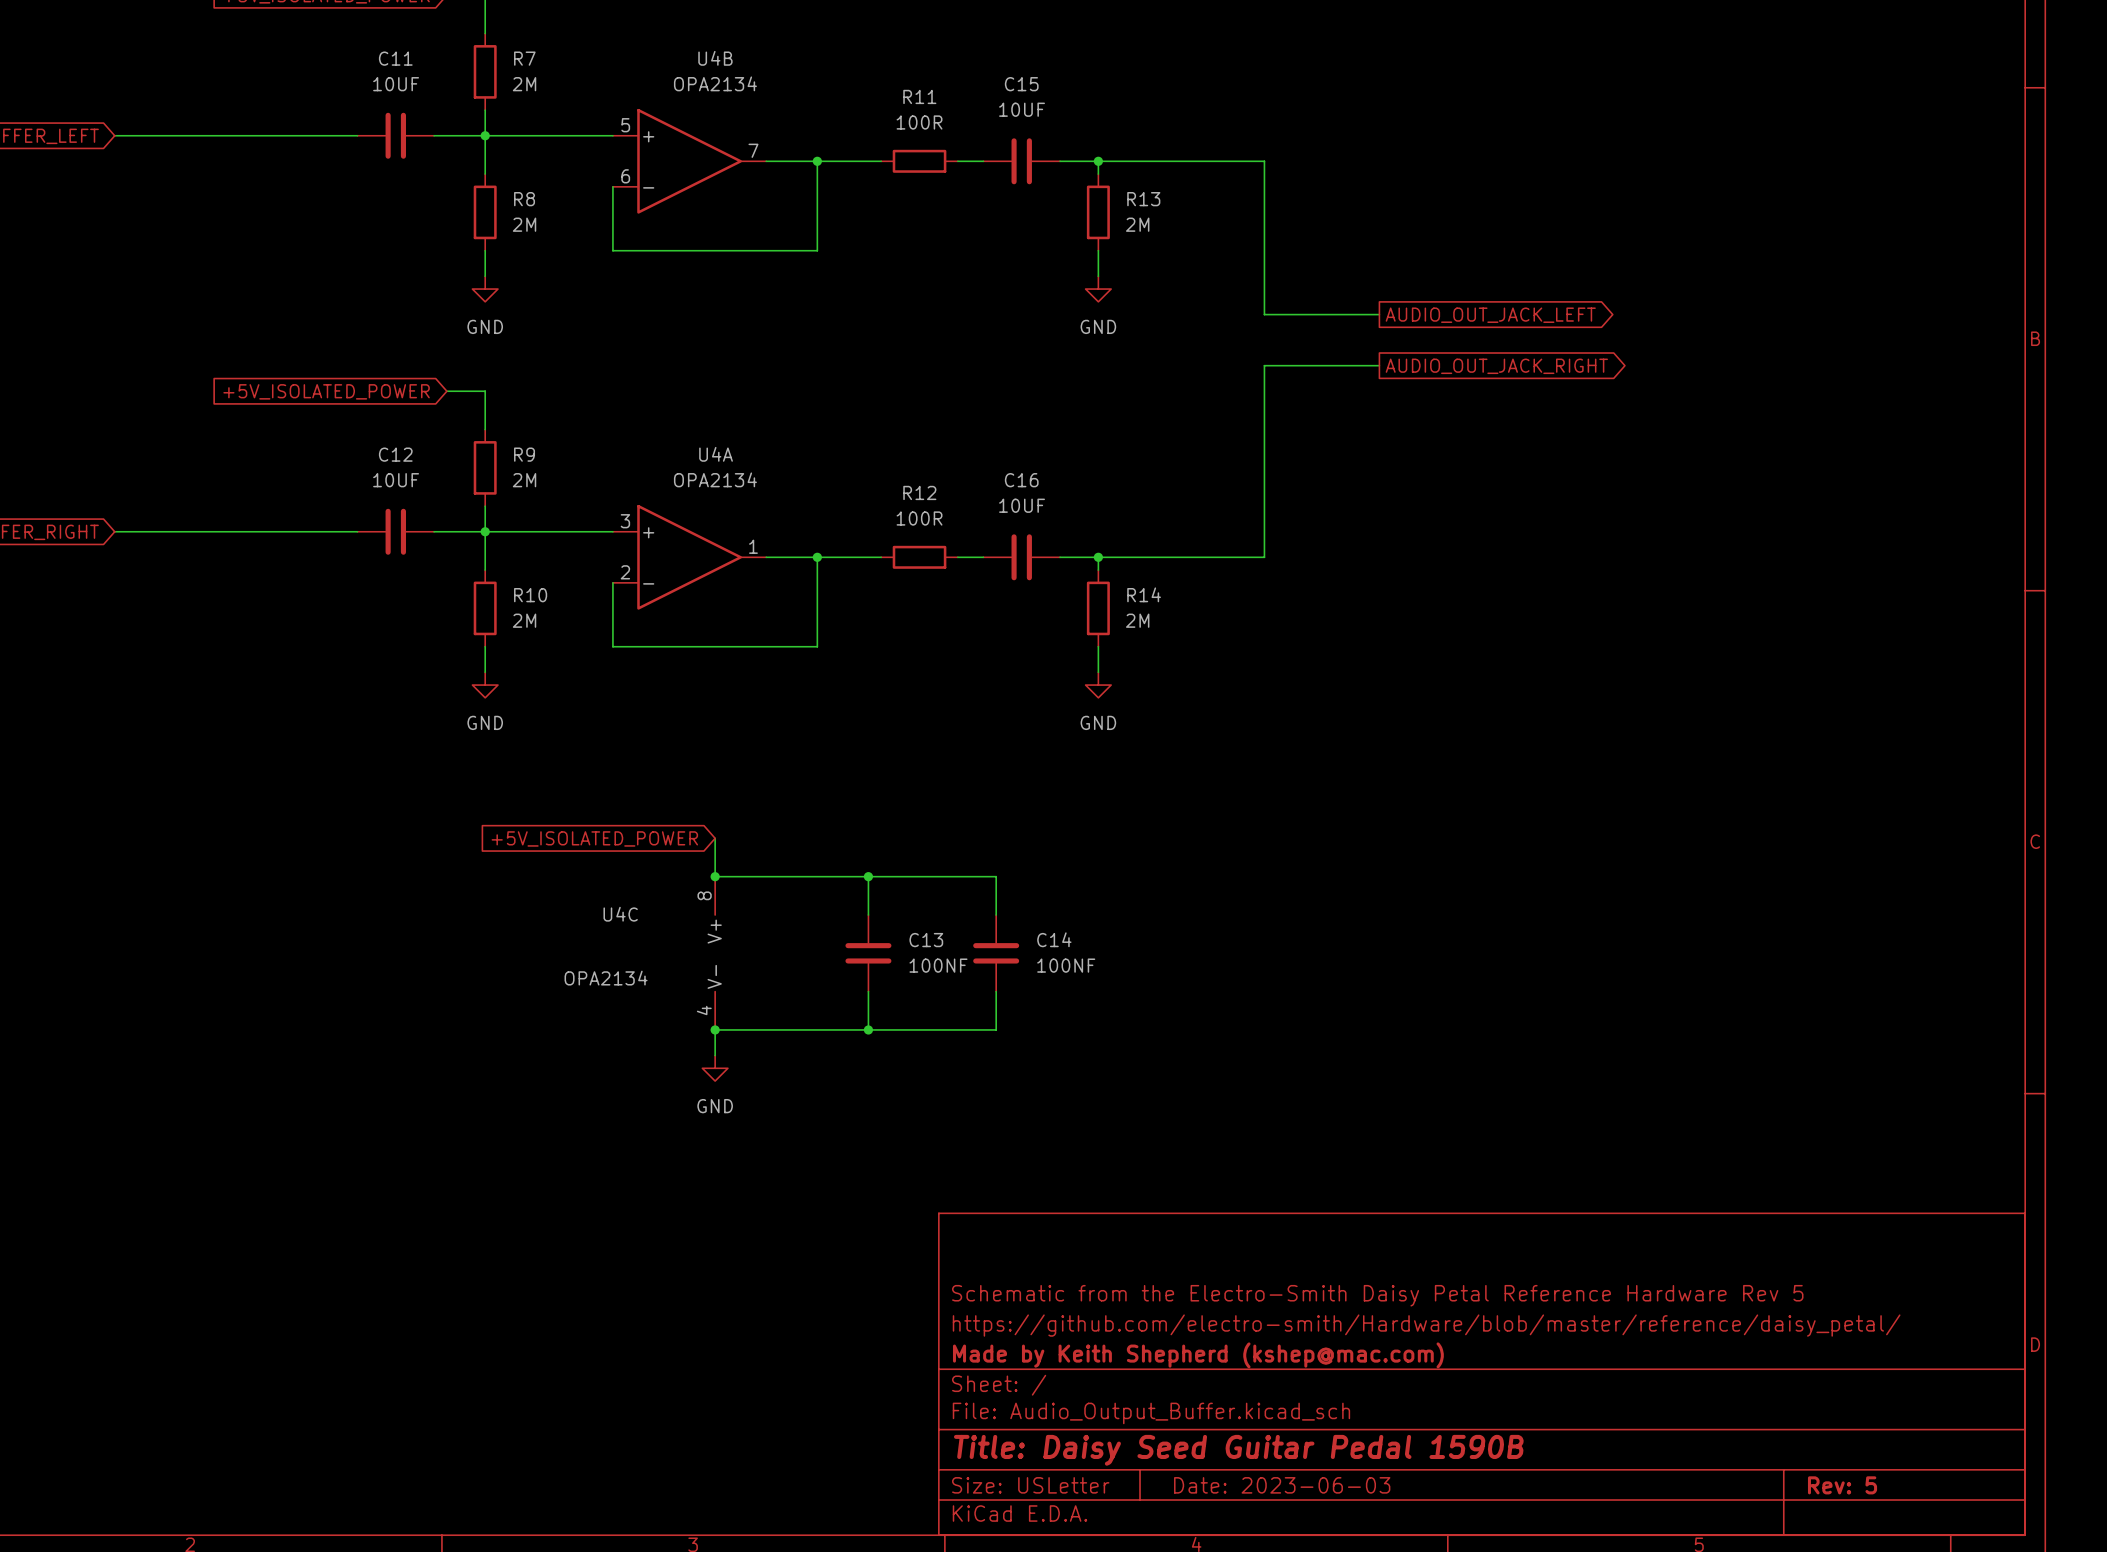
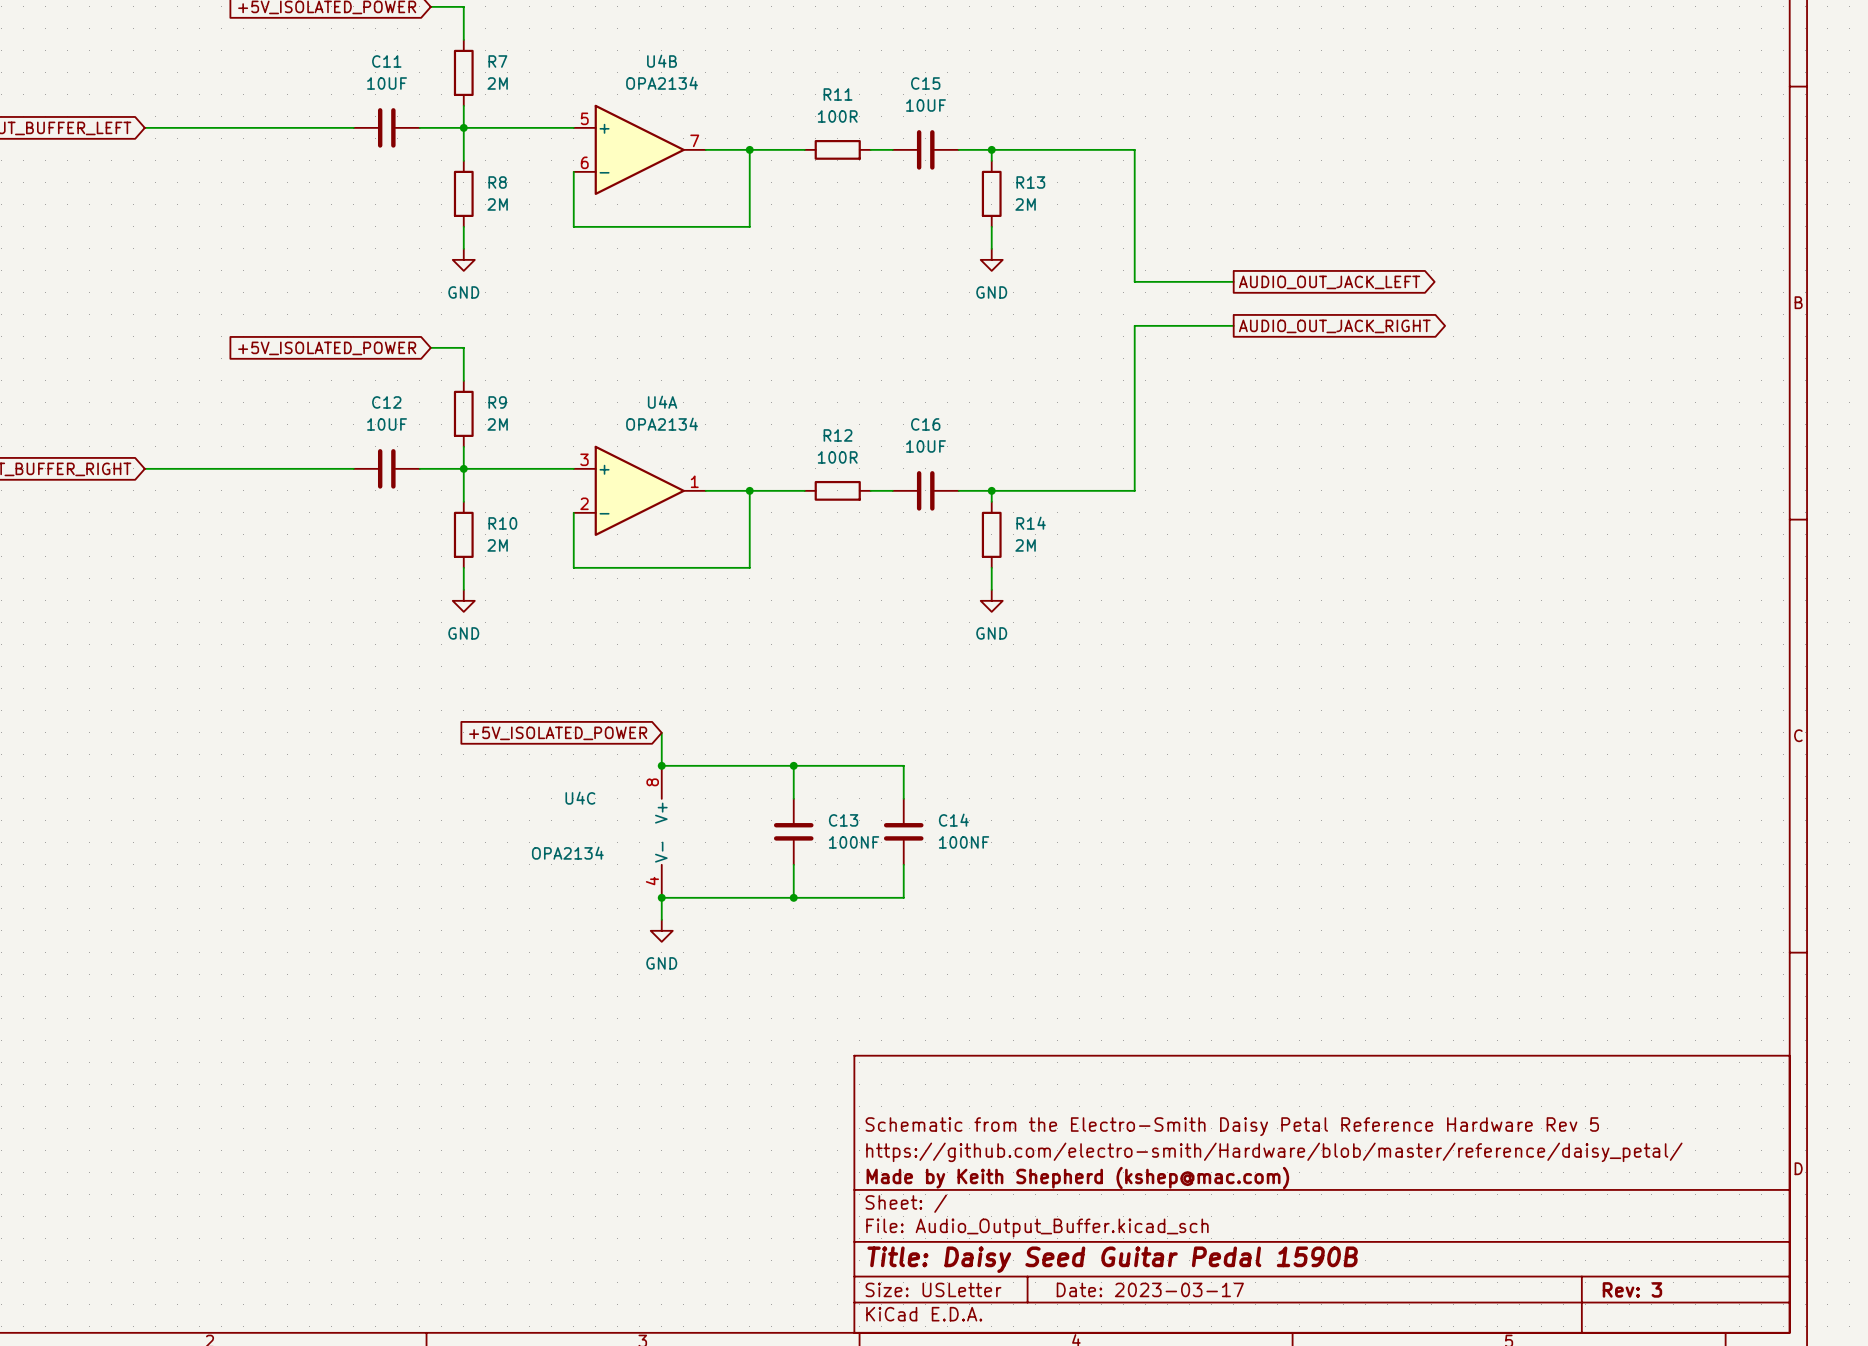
title block: Date: 2023-06-03 (1282, 1485) -> Date: 2023-03-17 (1150, 1289)
title block: Rev: 5 (1842, 1485) -> Rev: 3 (1632, 1289)

